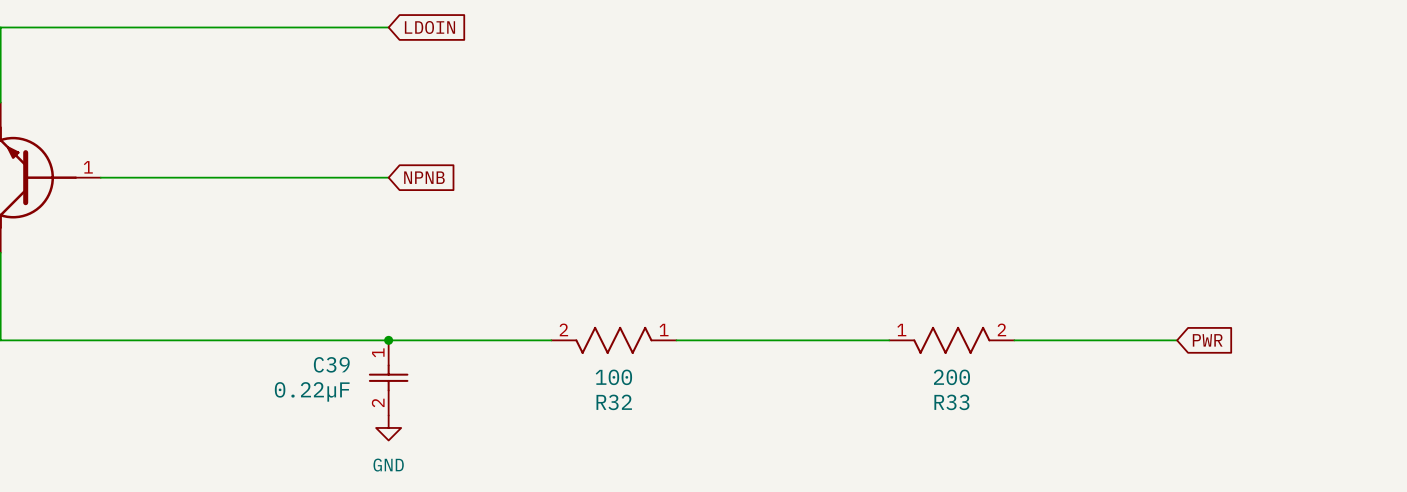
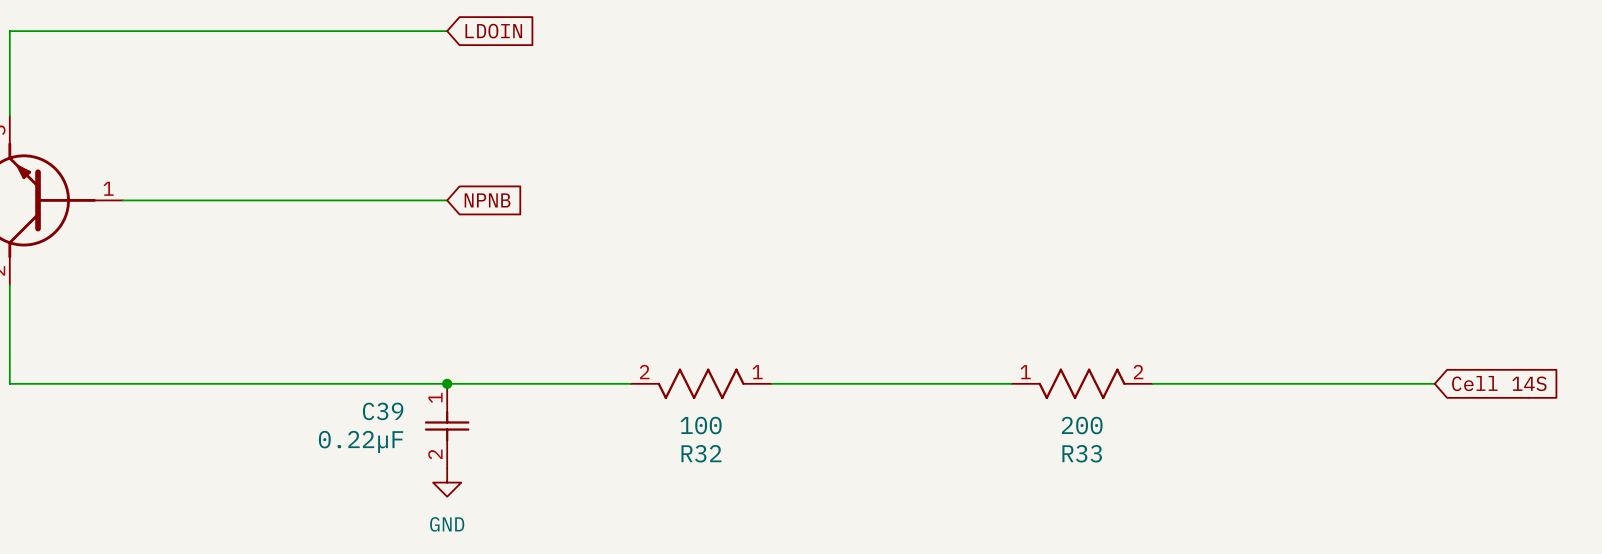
wire: none -> (1336, 383) (1434, 383)
global label: PWR (1207, 340) -> none
global label: none -> Cell 14S (1499, 383)

